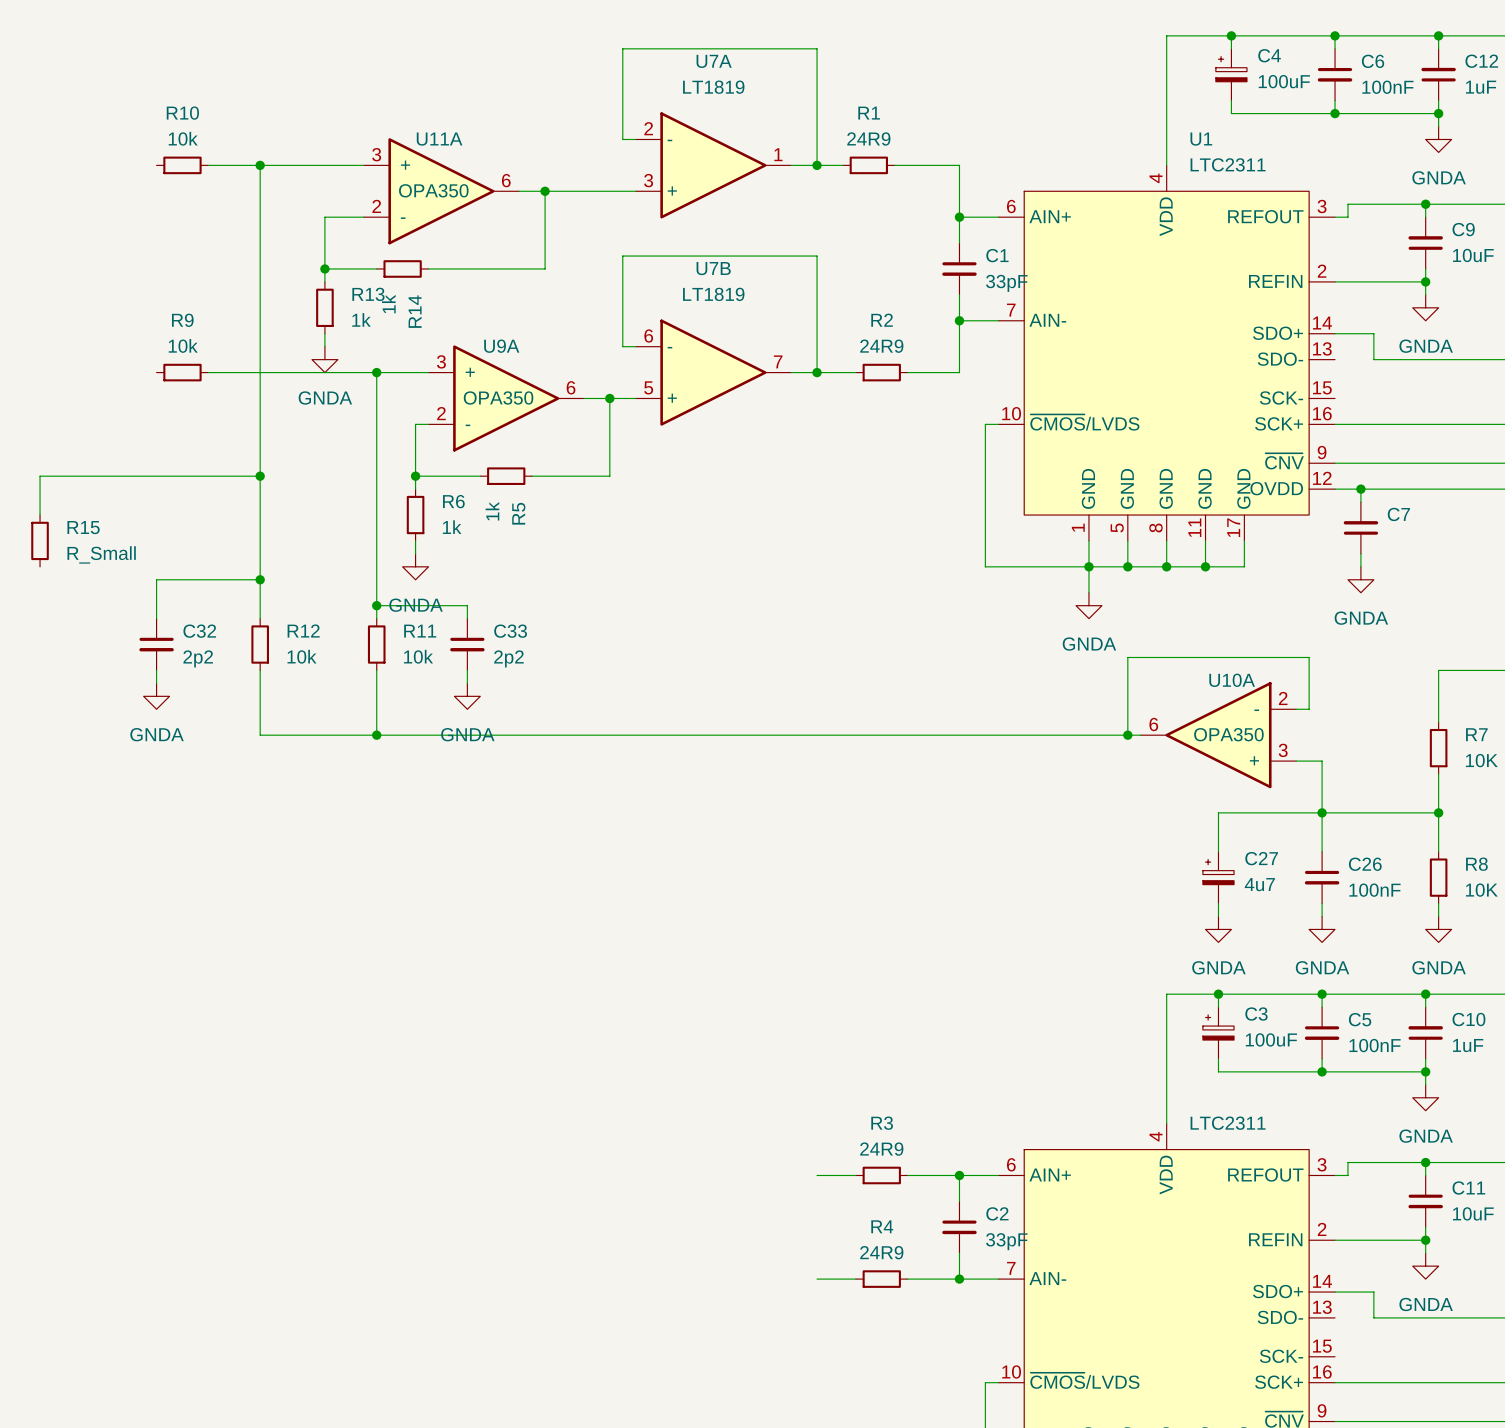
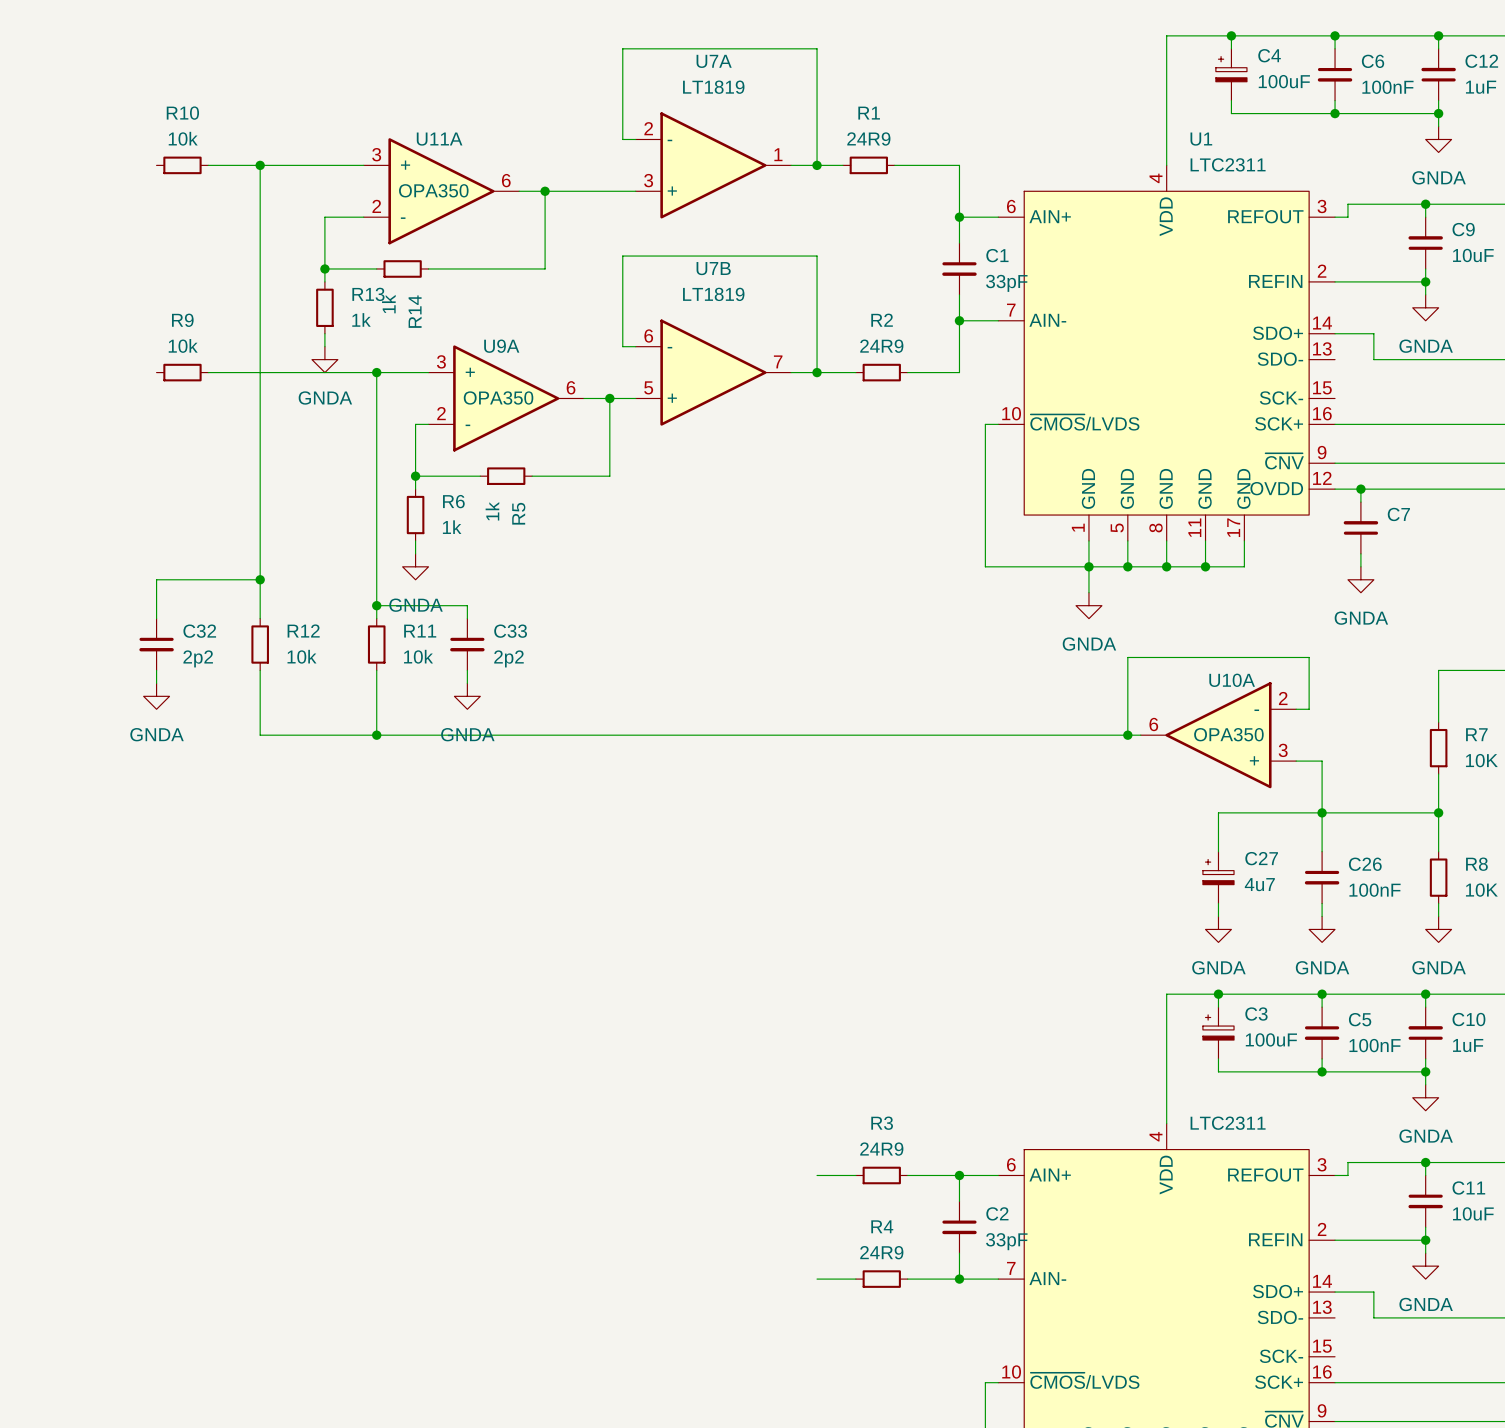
wire: (260, 476) (40, 476) (40, 515) -> none
junction: (260, 476) -> none
R15: R_Small (40, 540) -> none

